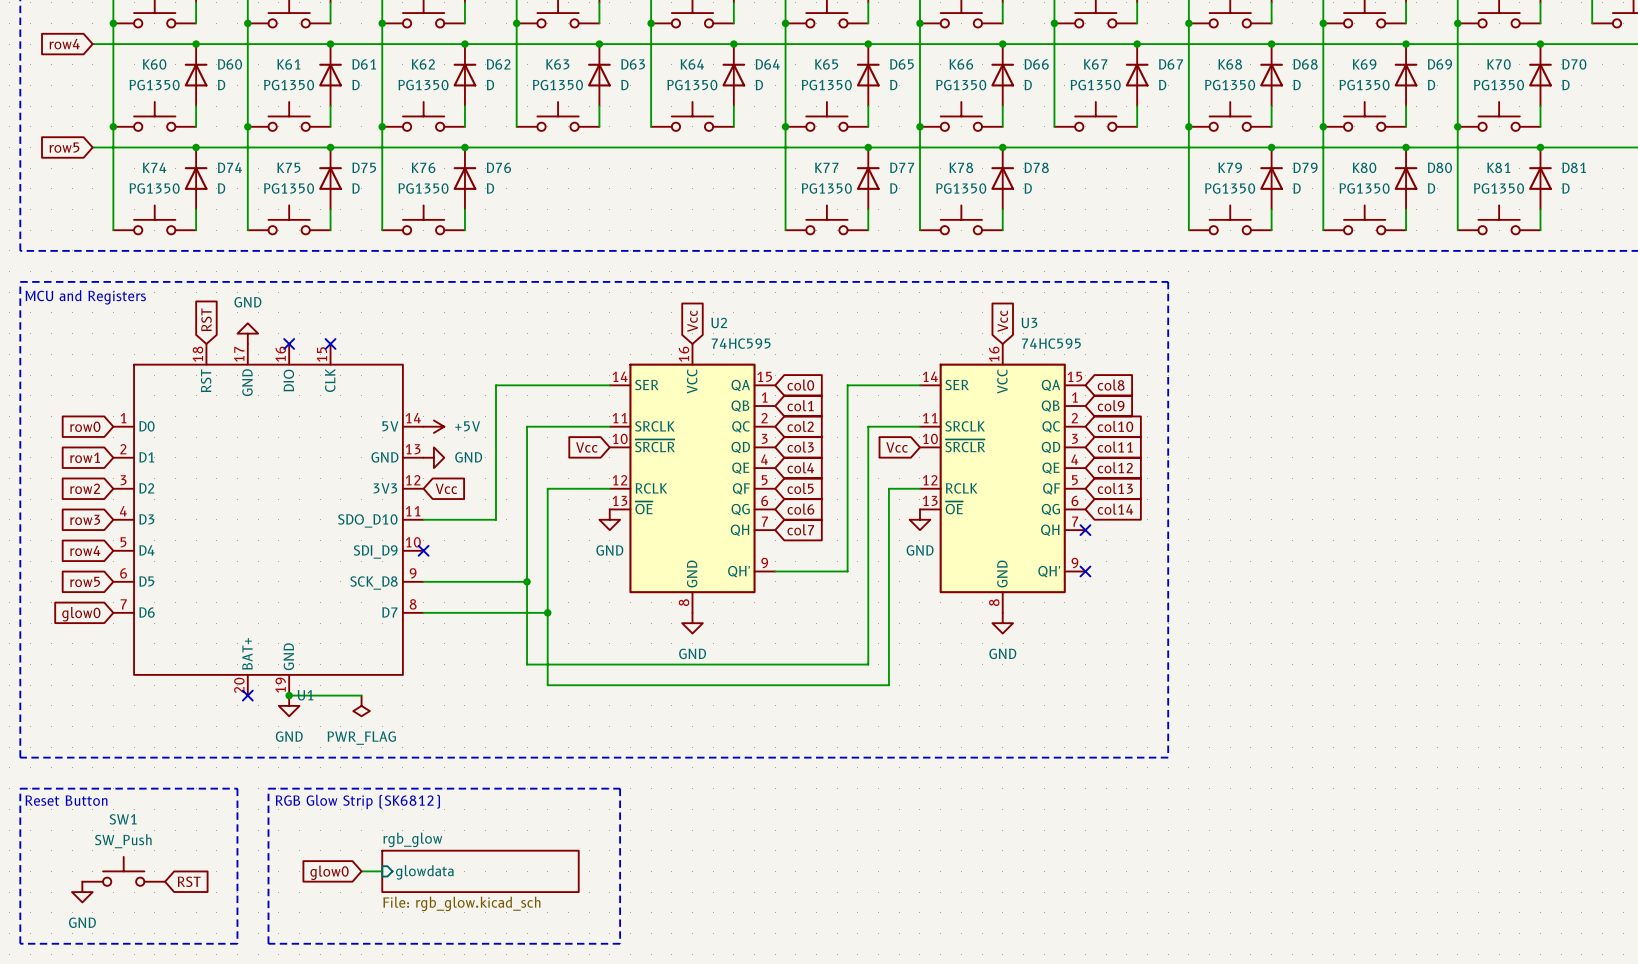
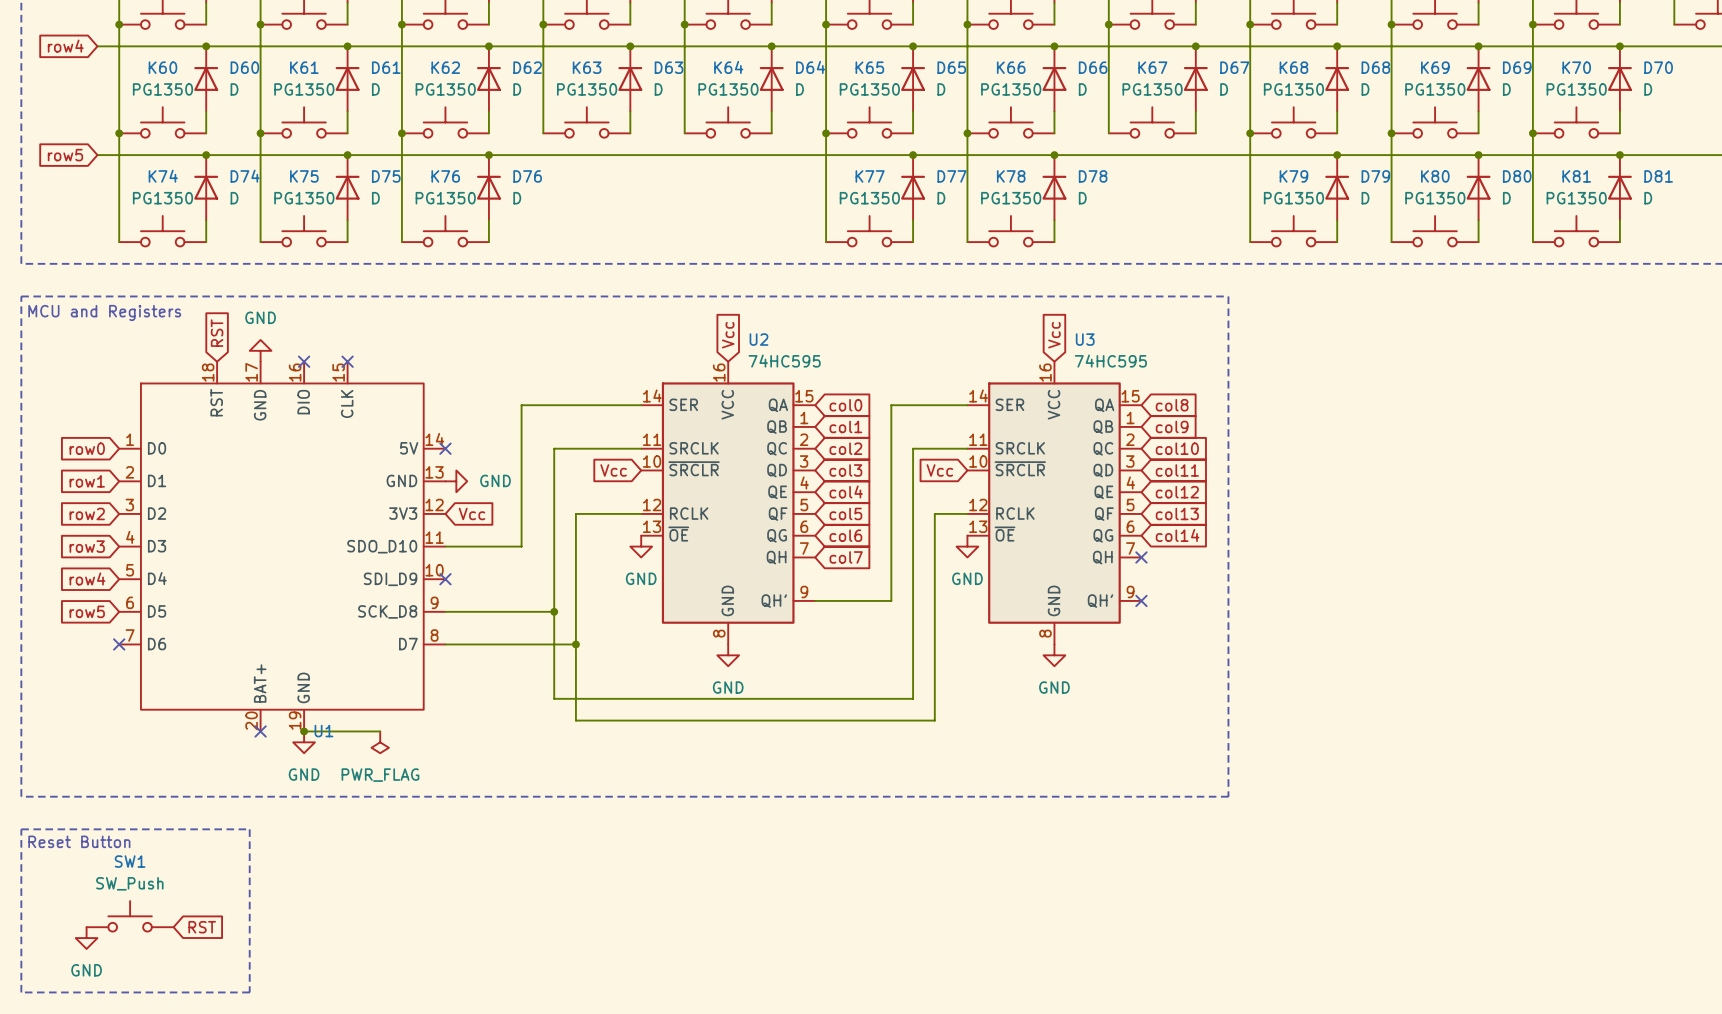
no-connect mark: none -> (445, 448)
power symbol: +5V (433, 426) -> none
no-connect mark: none -> (119, 644)
global label: glow0 (81, 614) -> none
line: (268, 788) (620, 788) (620, 943) (268, 943) (268, 788) -> none
text: RGB Glow Strip (SK6812) (357, 801) -> none
wire: (361, 871) (382, 871) -> none
sheet rgb_glow: File: rgb_glow.kicad_sch (480, 871) -> none
global label: glow0 (329, 872) -> none
sheet pin: glowdata (424, 872) -> none

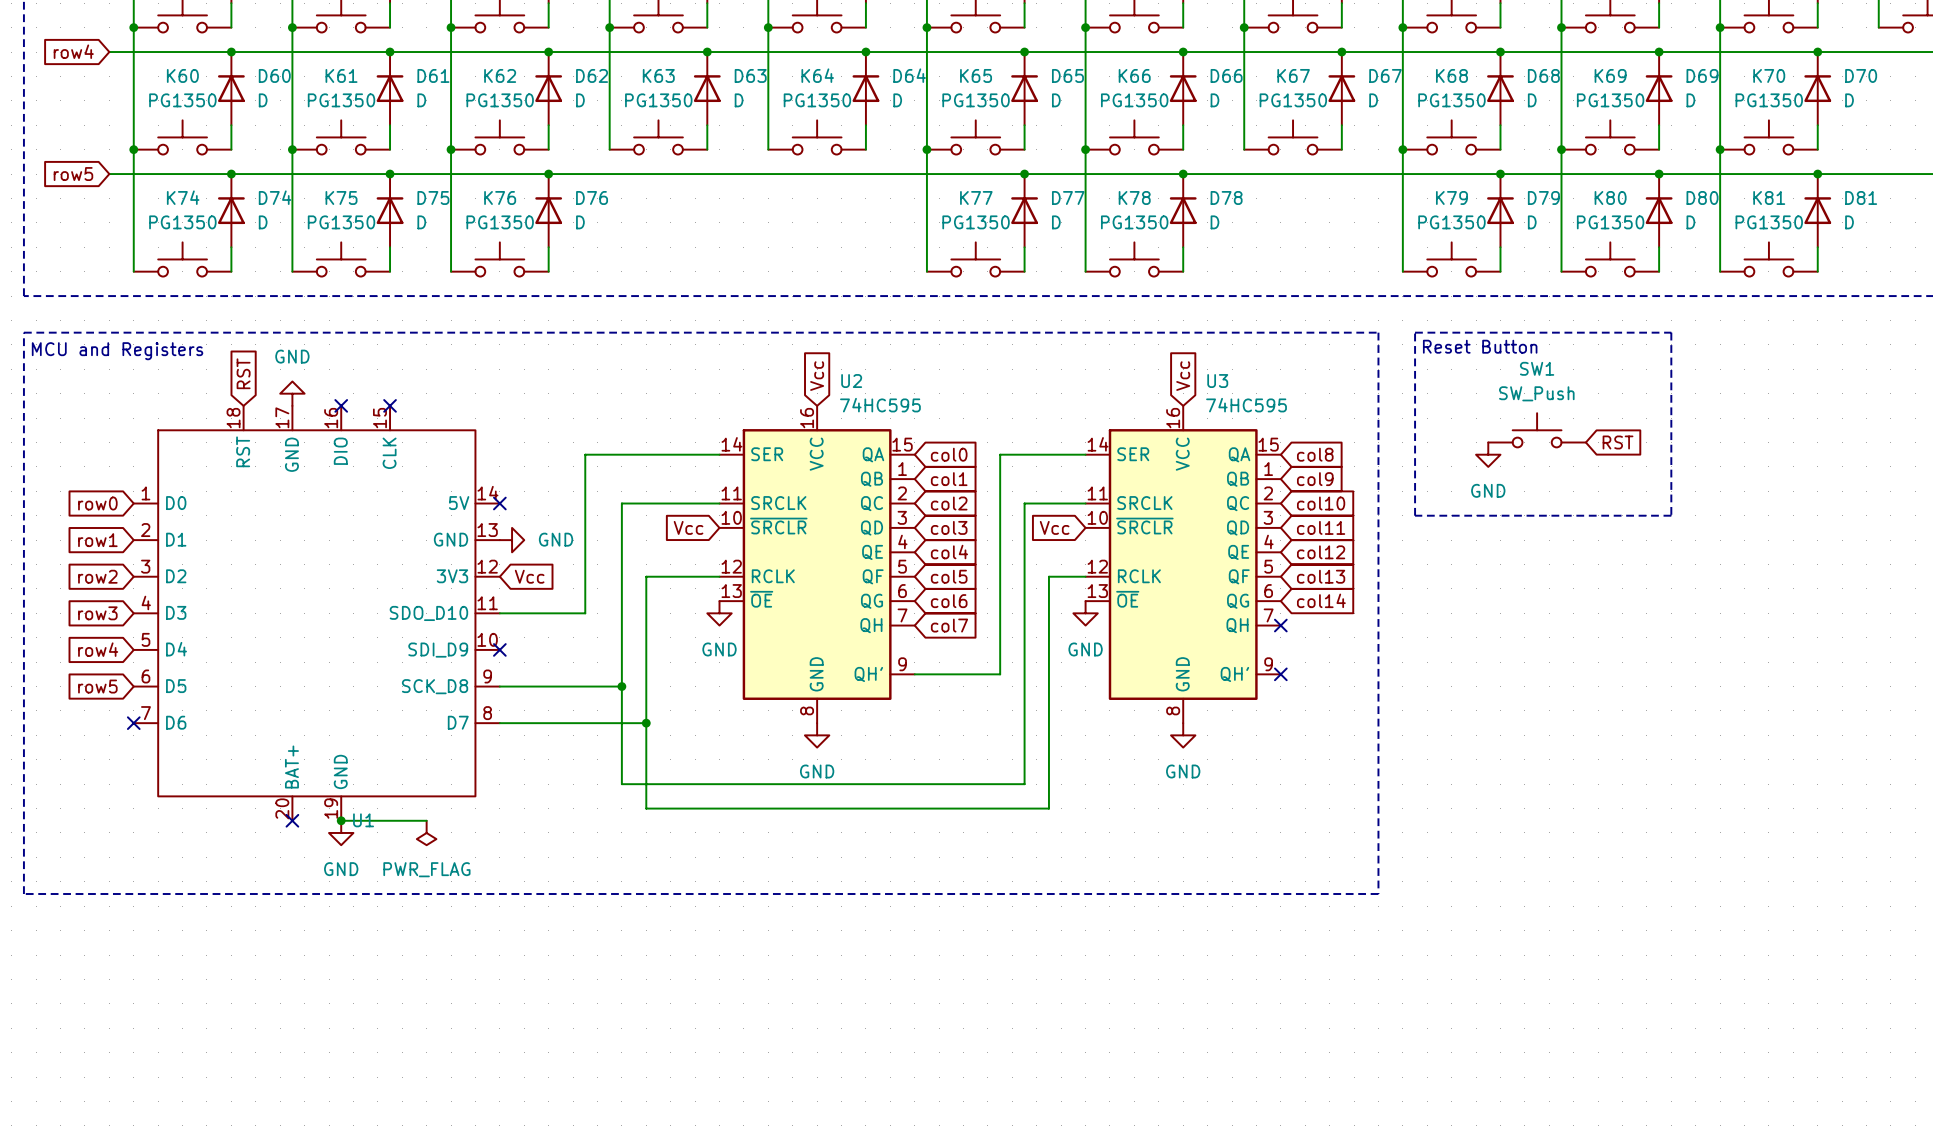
line: none -> (1415, 332) (1671, 332) (1671, 515) (1415, 515) (1415, 332)
text: none -> Reset Button (1480, 346)
global label: none -> RST (1618, 442)
power symbol: none -> GND (1488, 454)
line: (21, 829) (21, 992) (249, 992) (249, 829) (21, 829) -> none
text: Reset Button (79, 841) -> none
SW1 position: (130, 916) -> (1537, 430)
global label: RST (202, 927) -> none
power symbol: GND (86, 938) -> none

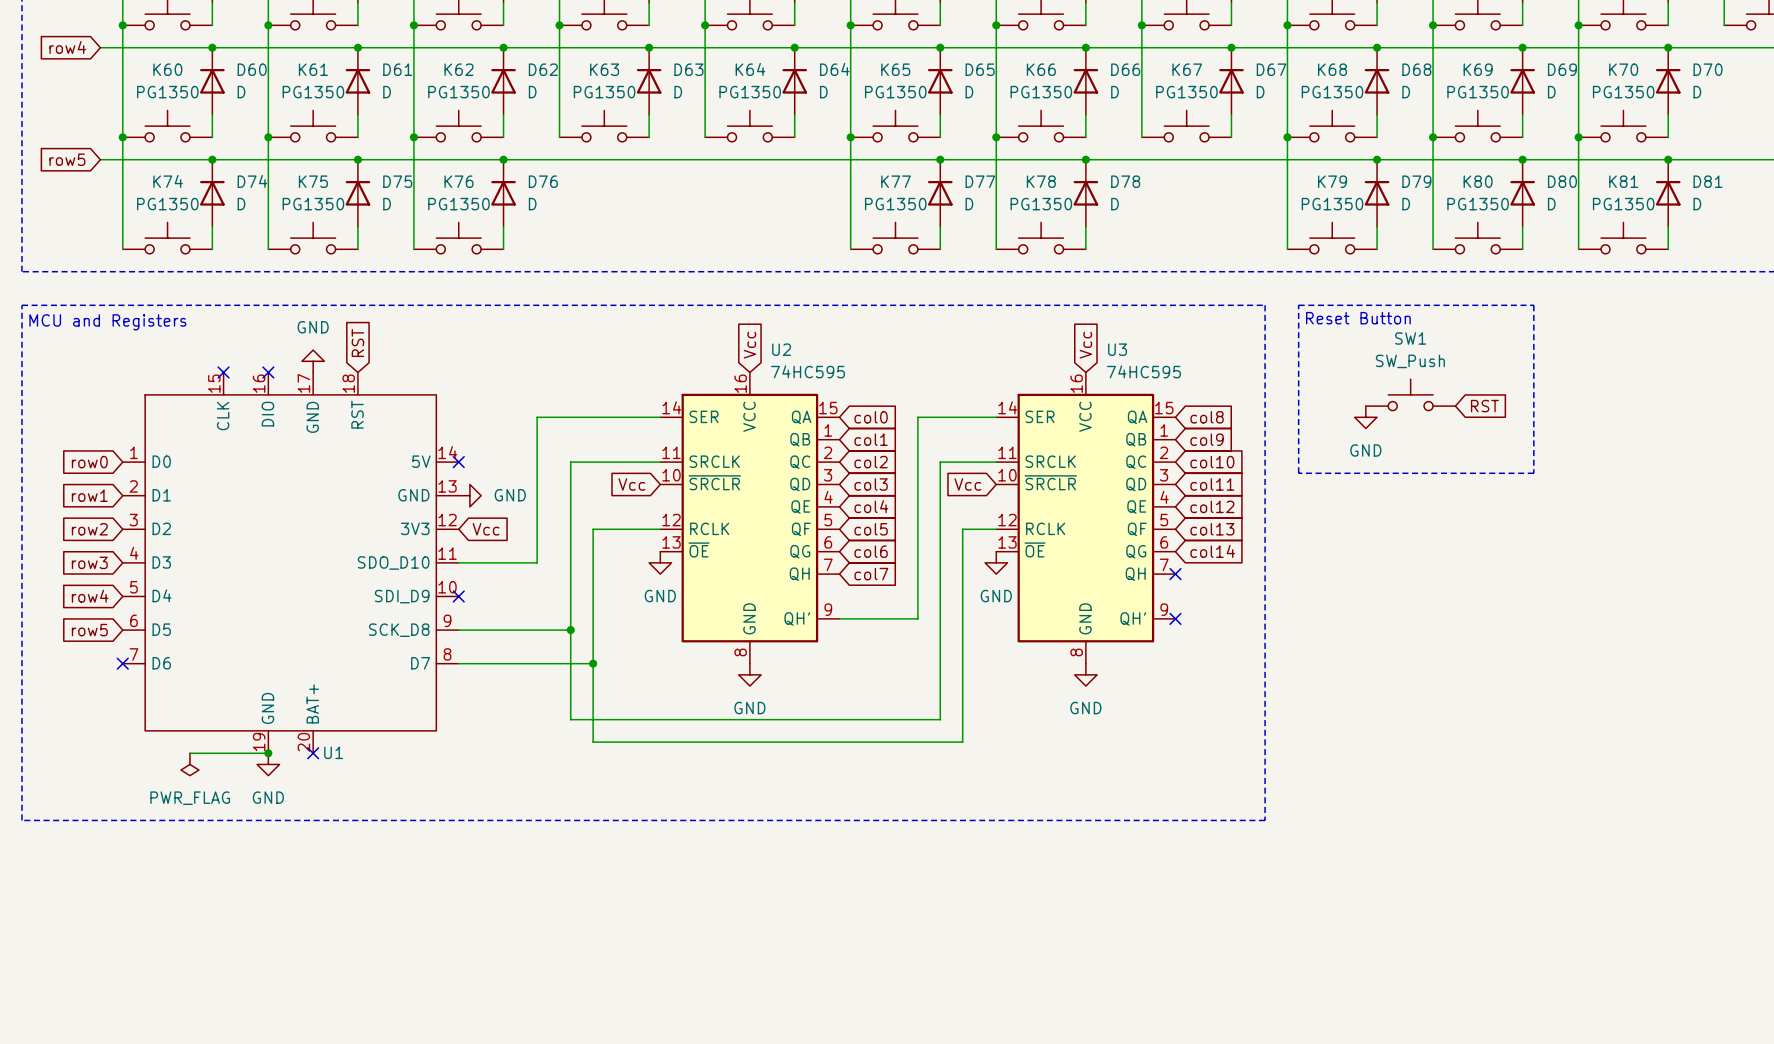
global label position: RST (243, 373) -> RST (357, 343)
power symbol position: GND (292, 393) -> GND (313, 361)
U1 symbol: [133, 405, 500, 821] -> [122, 372, 459, 754]
no-connect mark: none -> (223, 372)
no-connect mark: none -> (268, 372)
no-connect mark: (341, 405) -> none
no-connect mark: (390, 405) -> none
no-connect mark position: (292, 820) -> (313, 753)
wire: (341, 820) (426, 820) -> (189, 753) (268, 753)
junction position: (341, 820) -> (268, 753)
power symbol position: GND (341, 832) -> GND (268, 764)
power symbol position: PWR_FLAG (426, 832) -> PWR_FLAG (189, 764)

